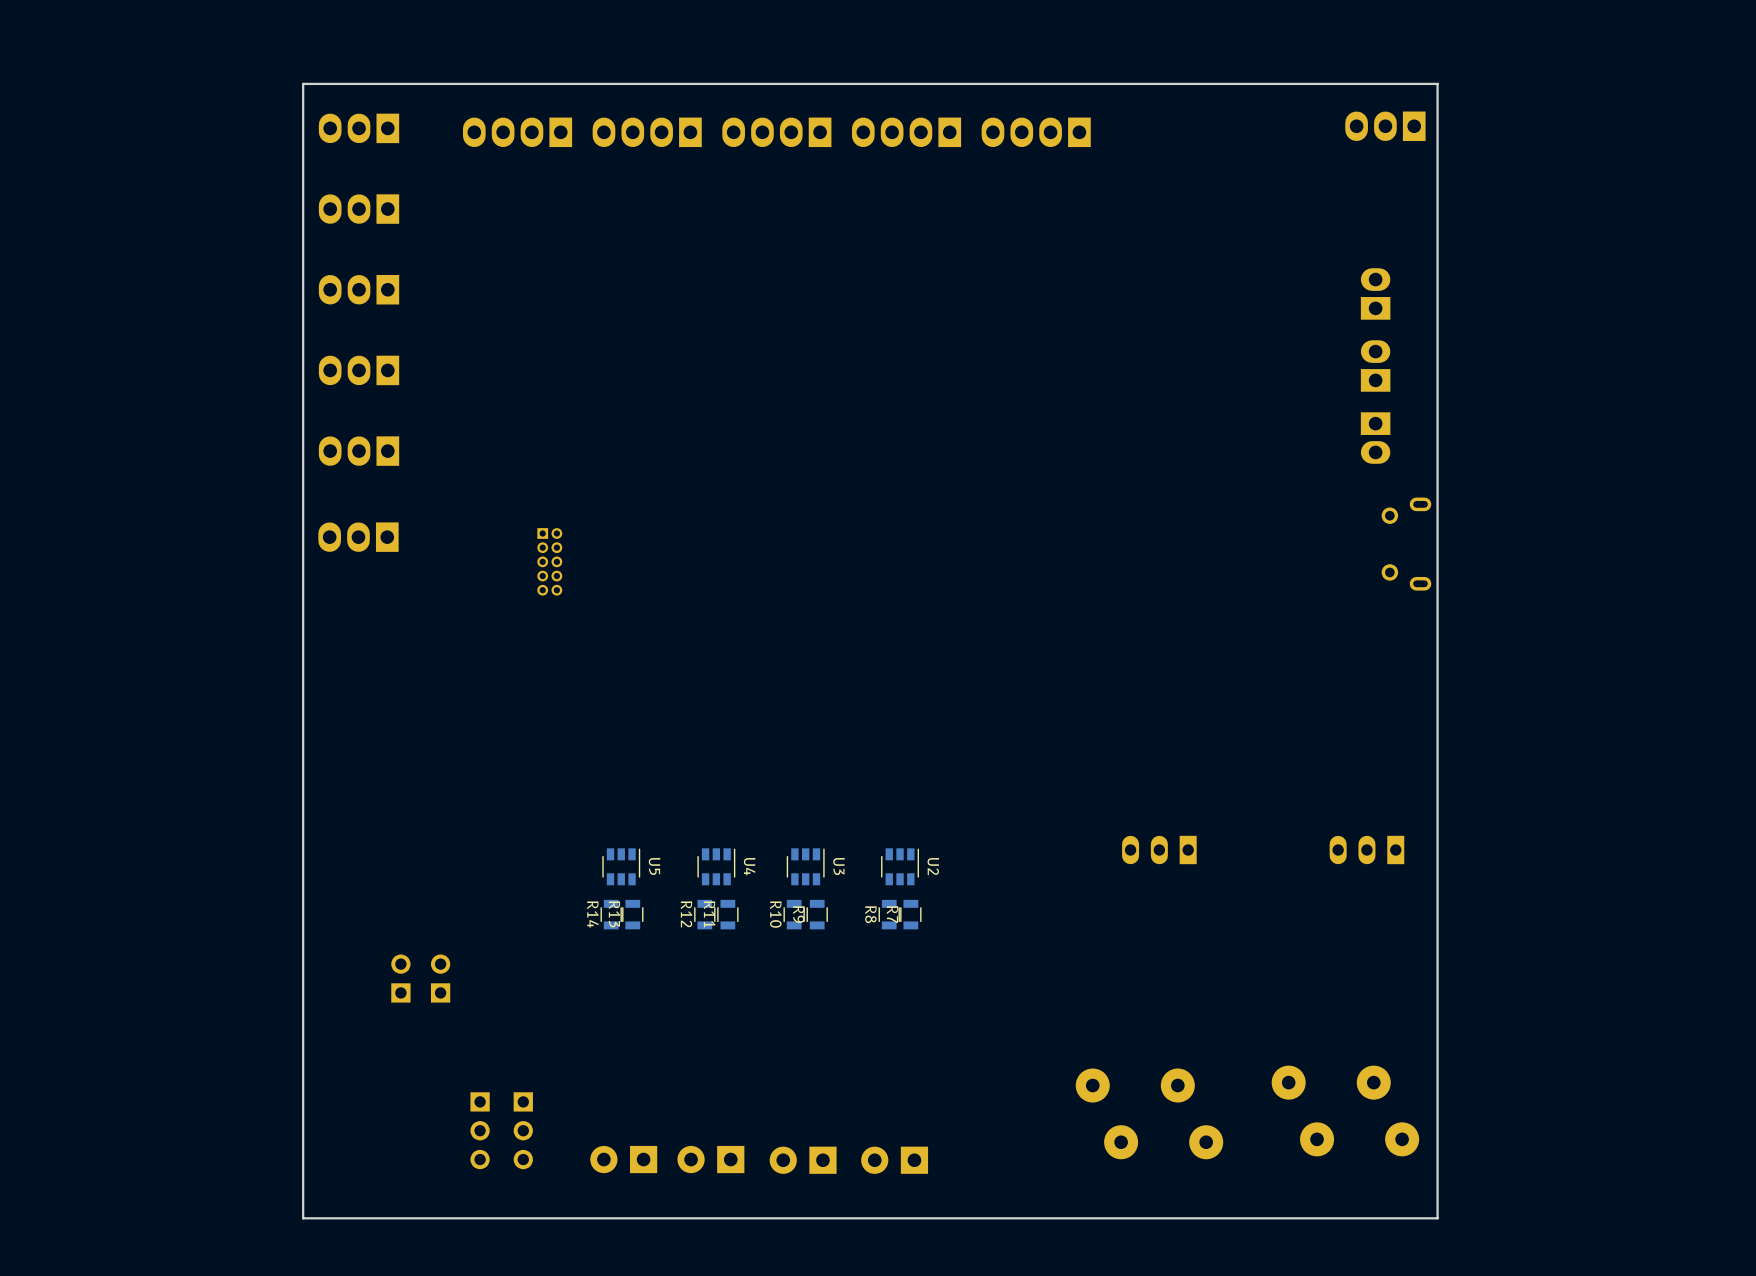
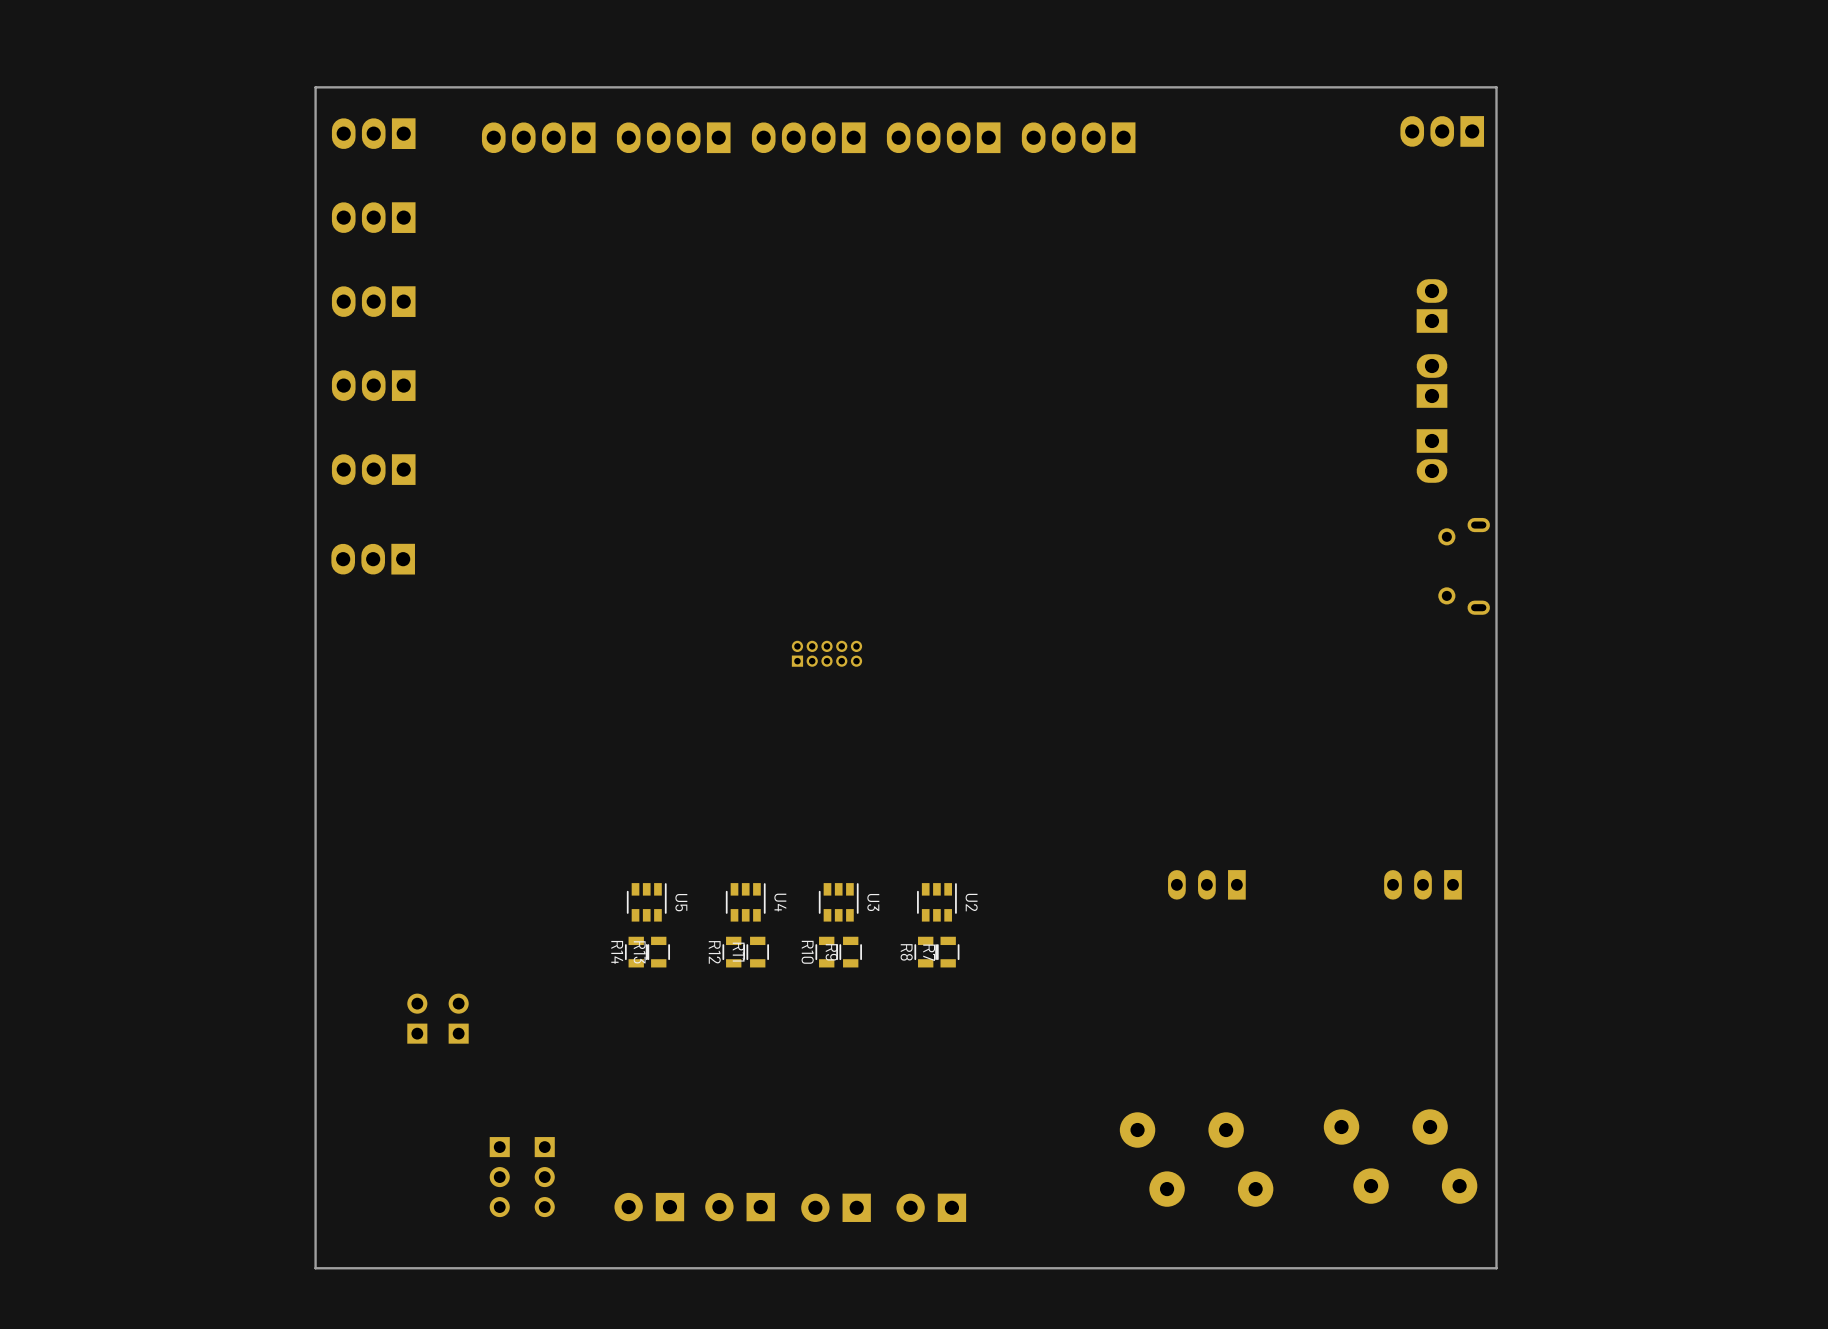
part rotation: 0° (549, 561) -> 90° counterclockwise (826, 653)
part position: (549, 561) -> (826, 653)

